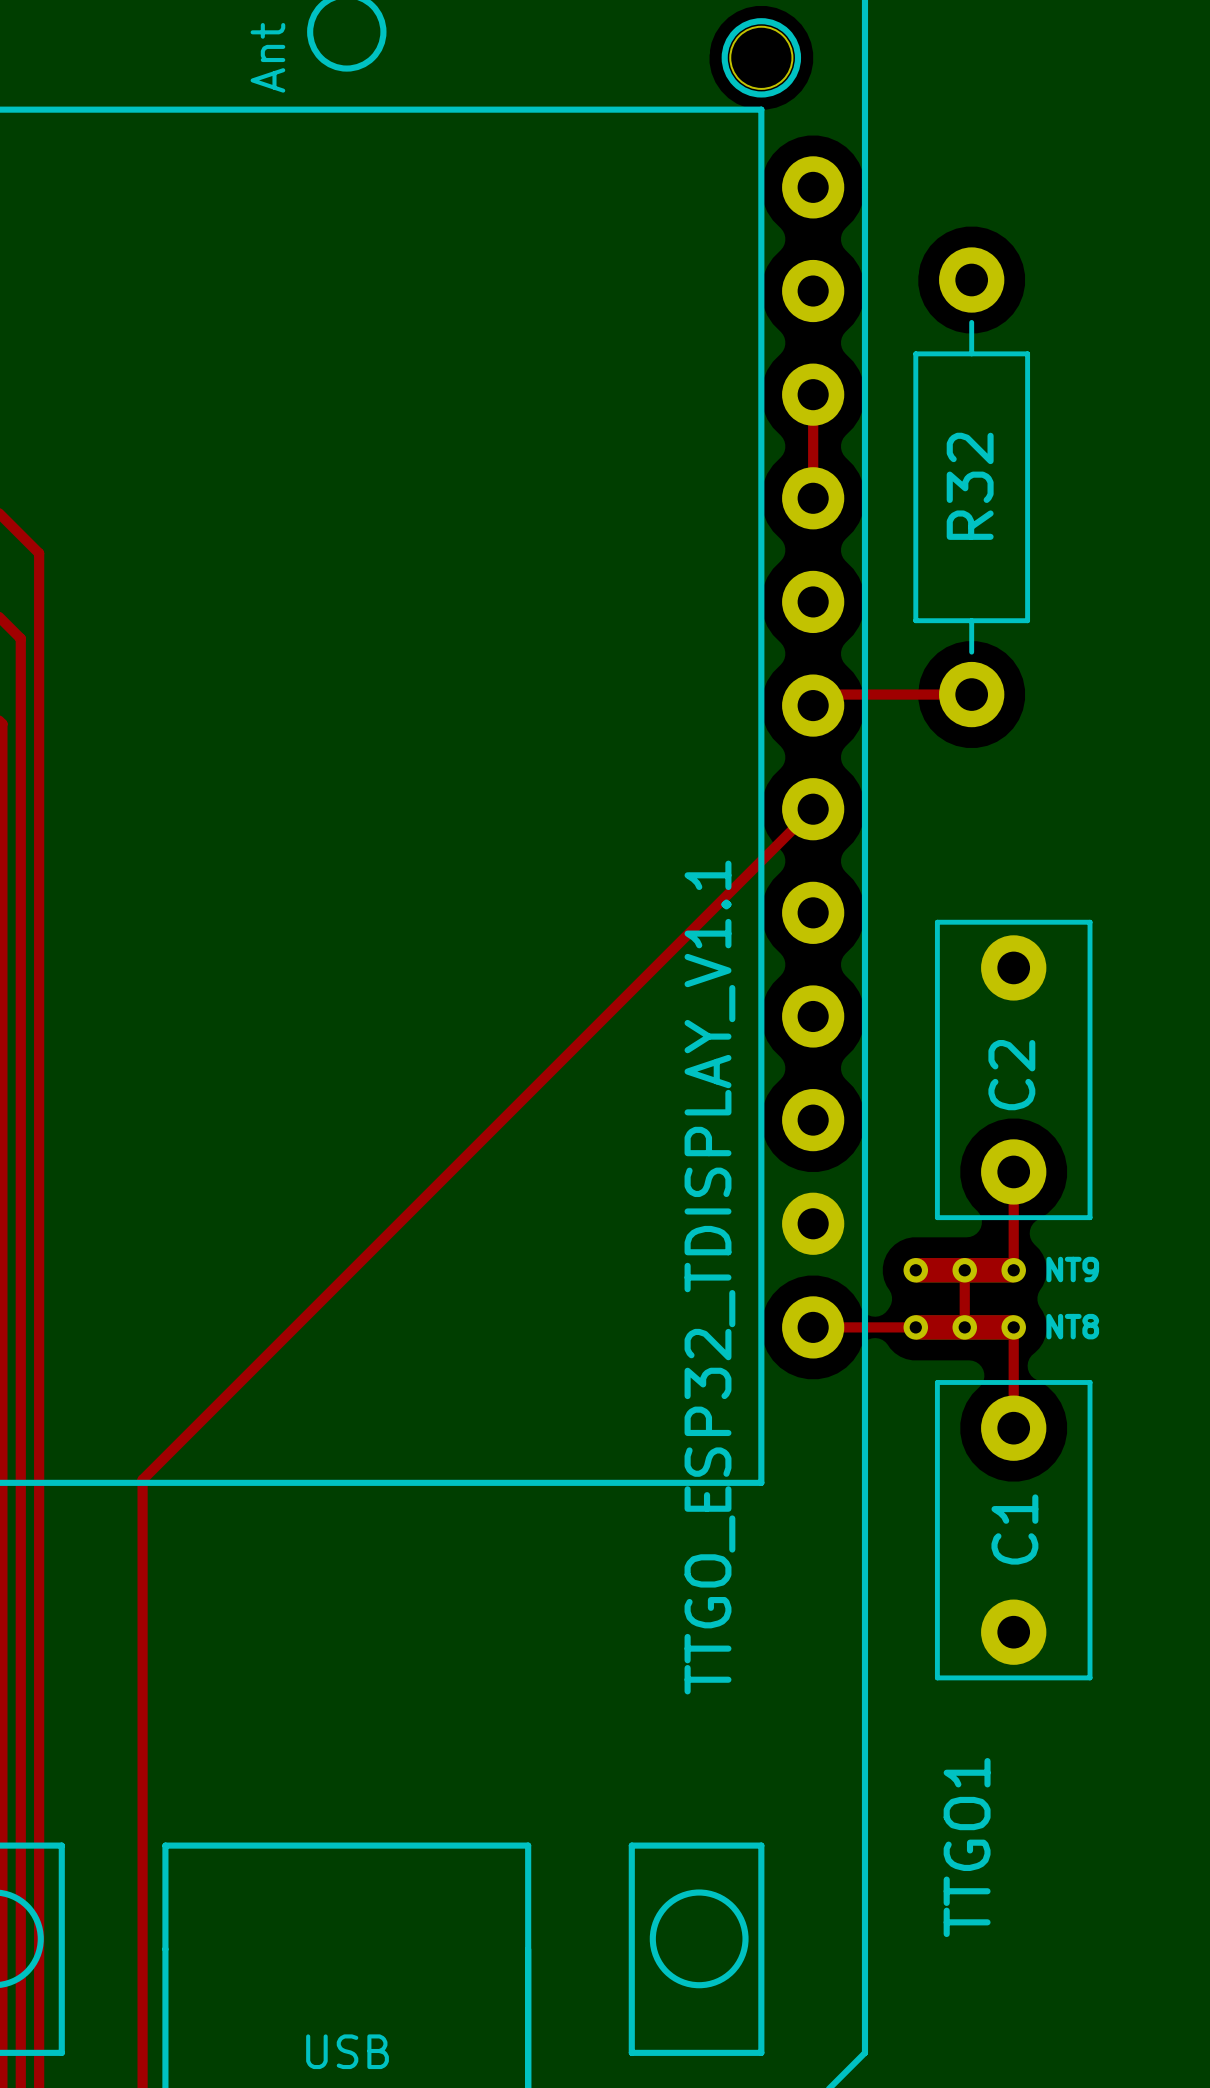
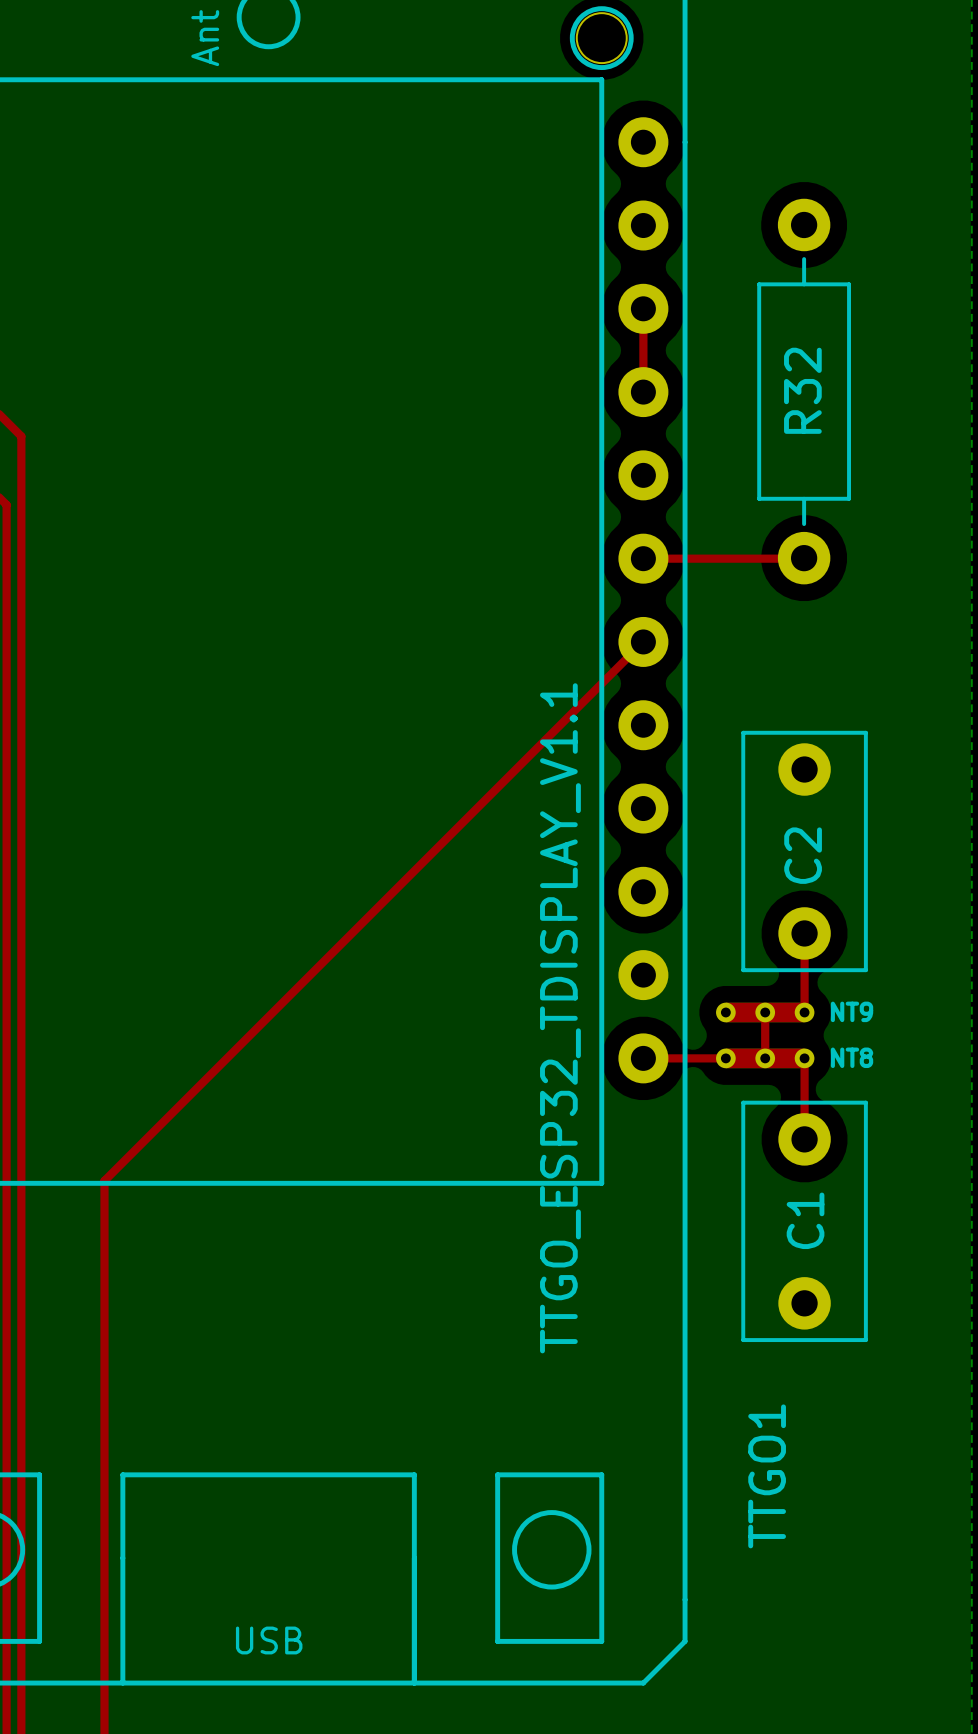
R32 position: (971, 487) -> (804, 391)
top track: (824, 694) (971, 694) -> none
top track: none -> (804, 558) (643, 558)

